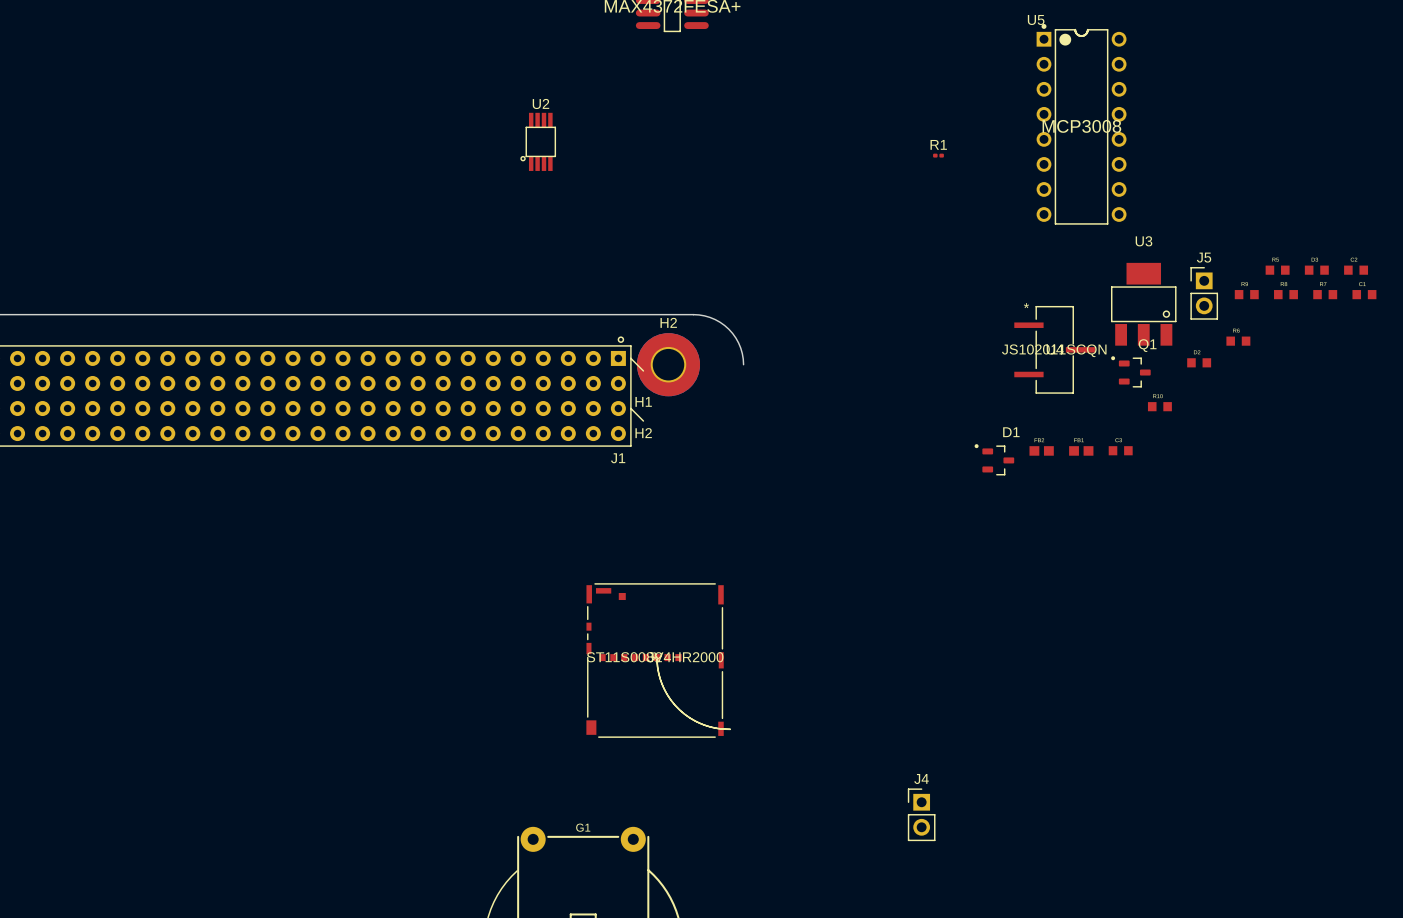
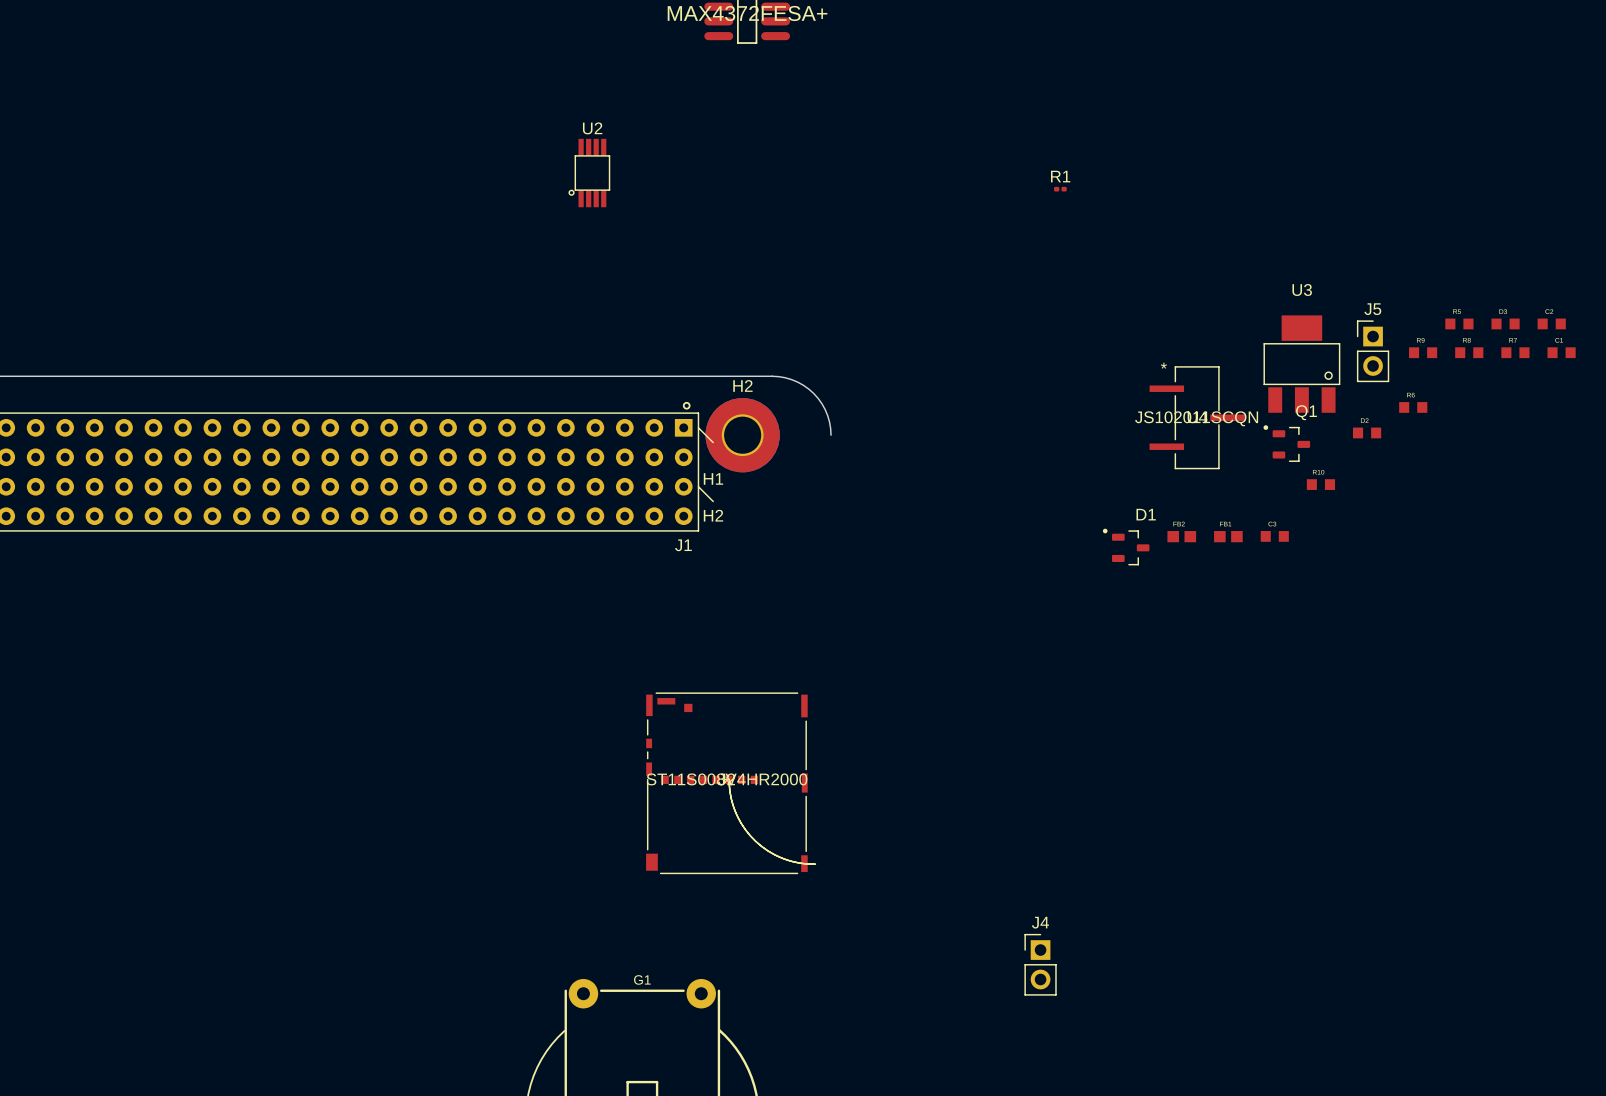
U5: MCP3008 (1081, 124) -> none

